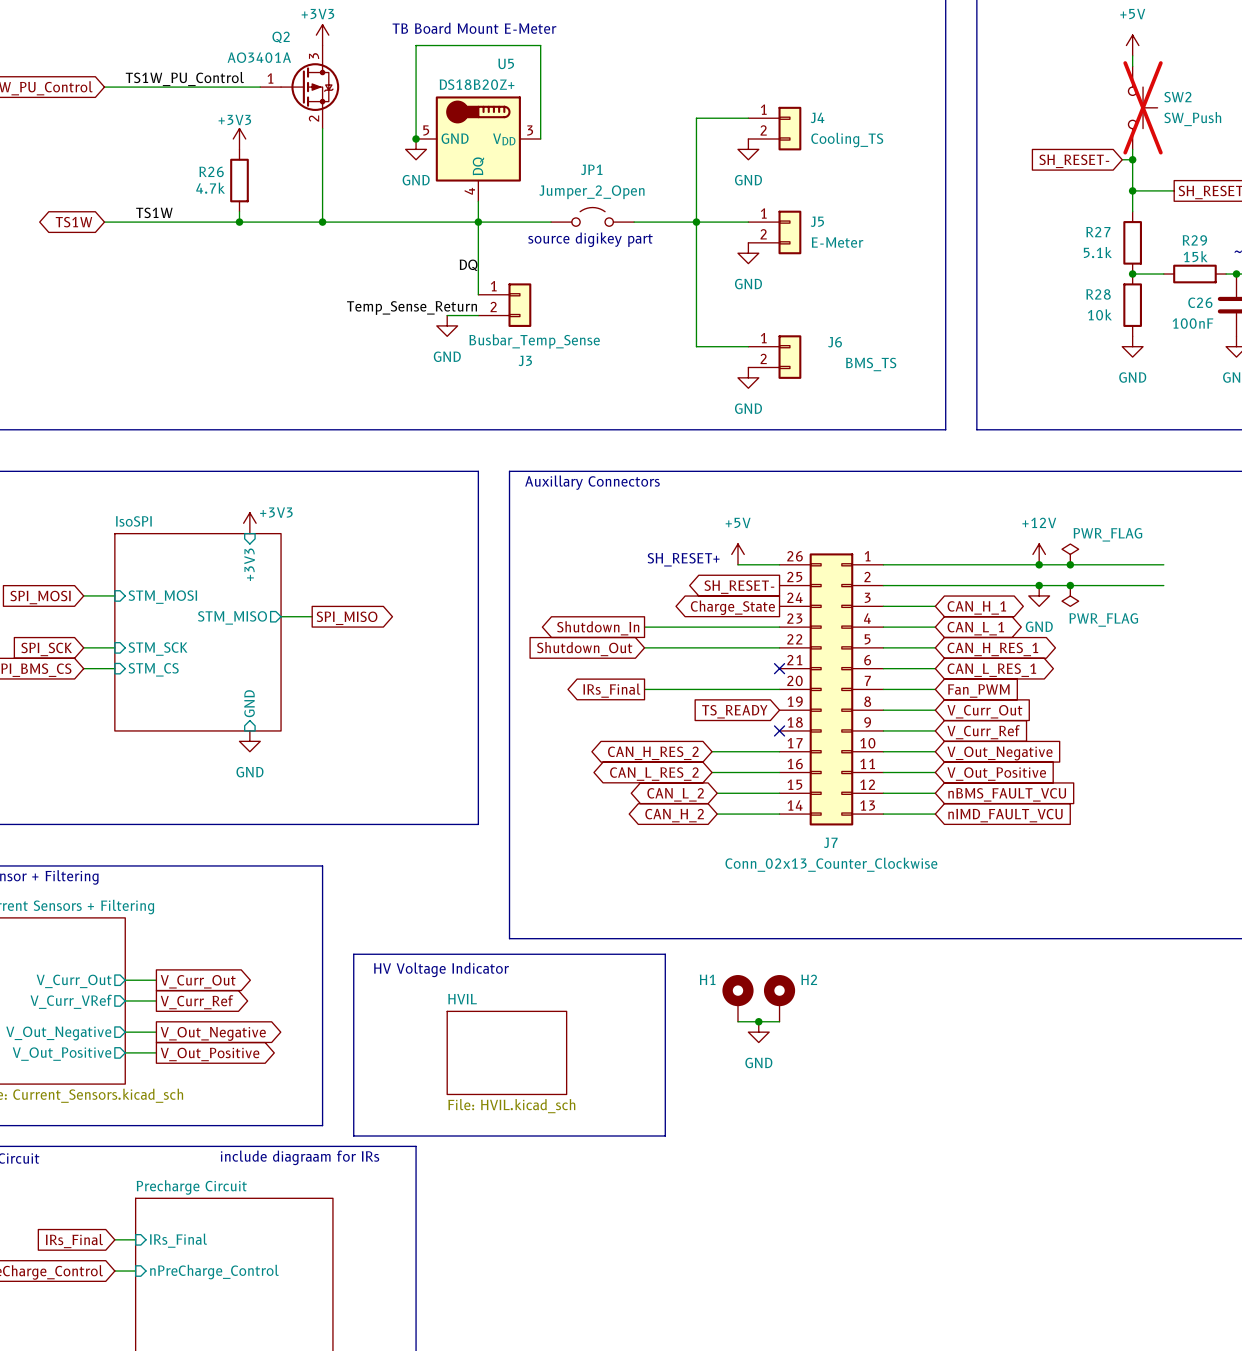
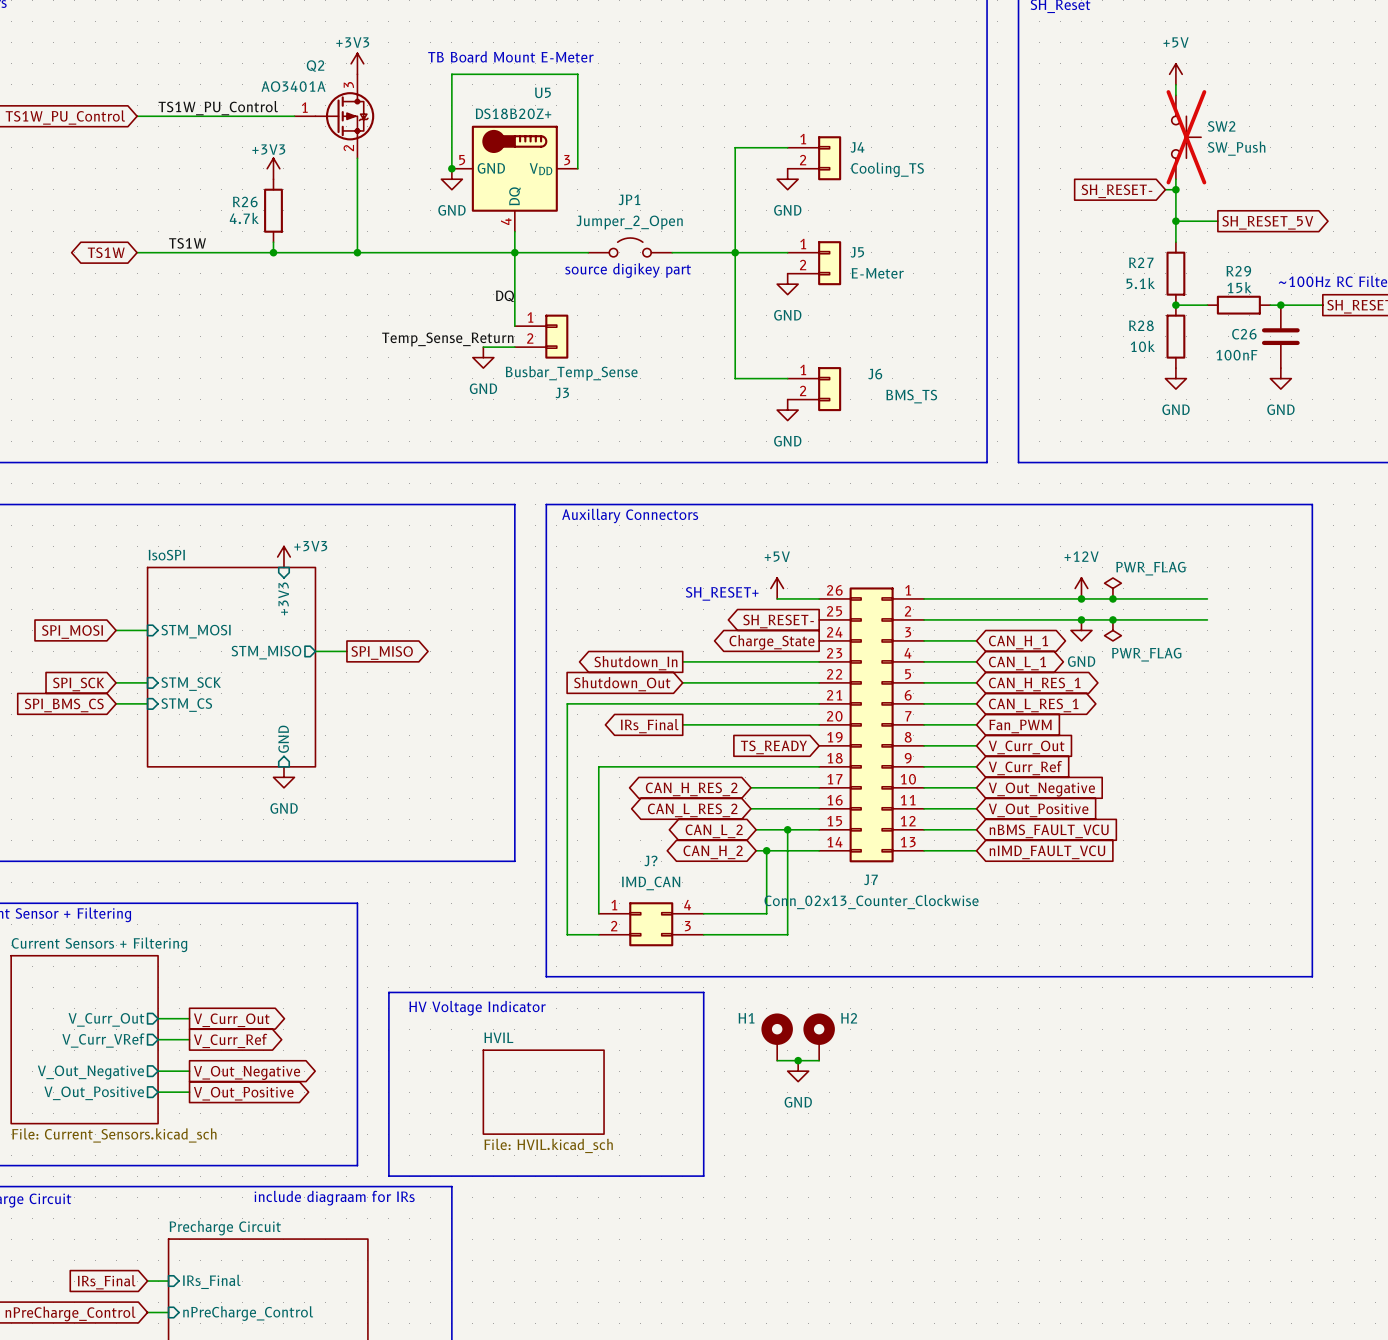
wire: none -> (819, 703) (567, 703) (567, 934) (598, 934)
no-connect mark: (779, 668) -> none
wire: none -> (819, 766) (598, 766) (598, 913)
no-connect mark: (779, 730) -> none
wire: none -> (787, 829) (787, 934) (703, 934)
junction: none -> (787, 829)
wire: none -> (766, 850) (766, 913) (703, 913)
junction: none -> (766, 850)
J?: none -> IMD_CAN (651, 924)

